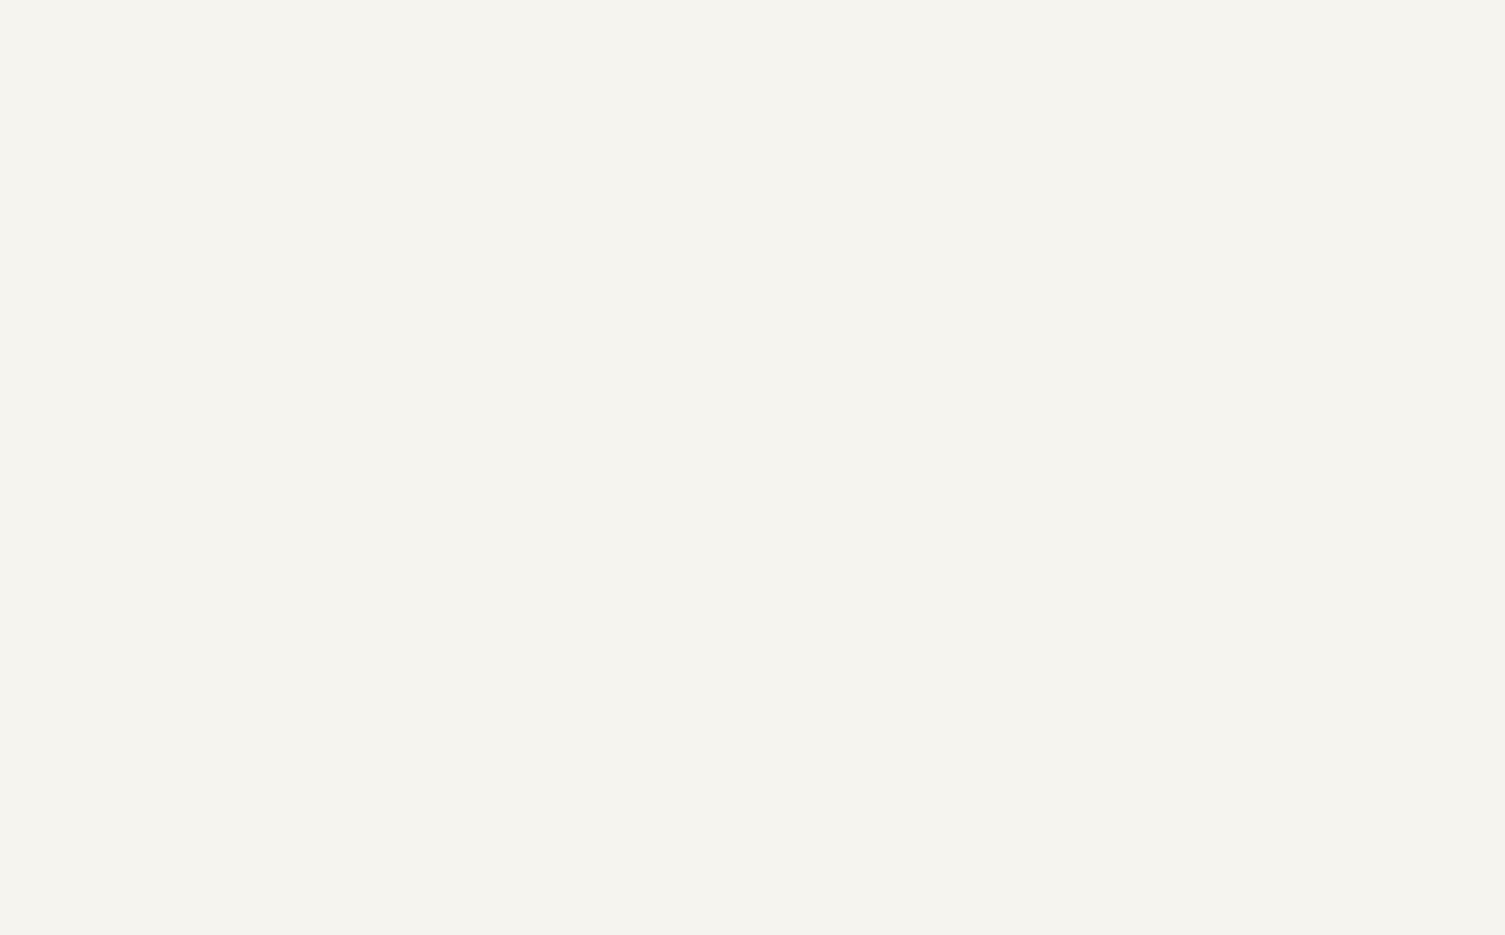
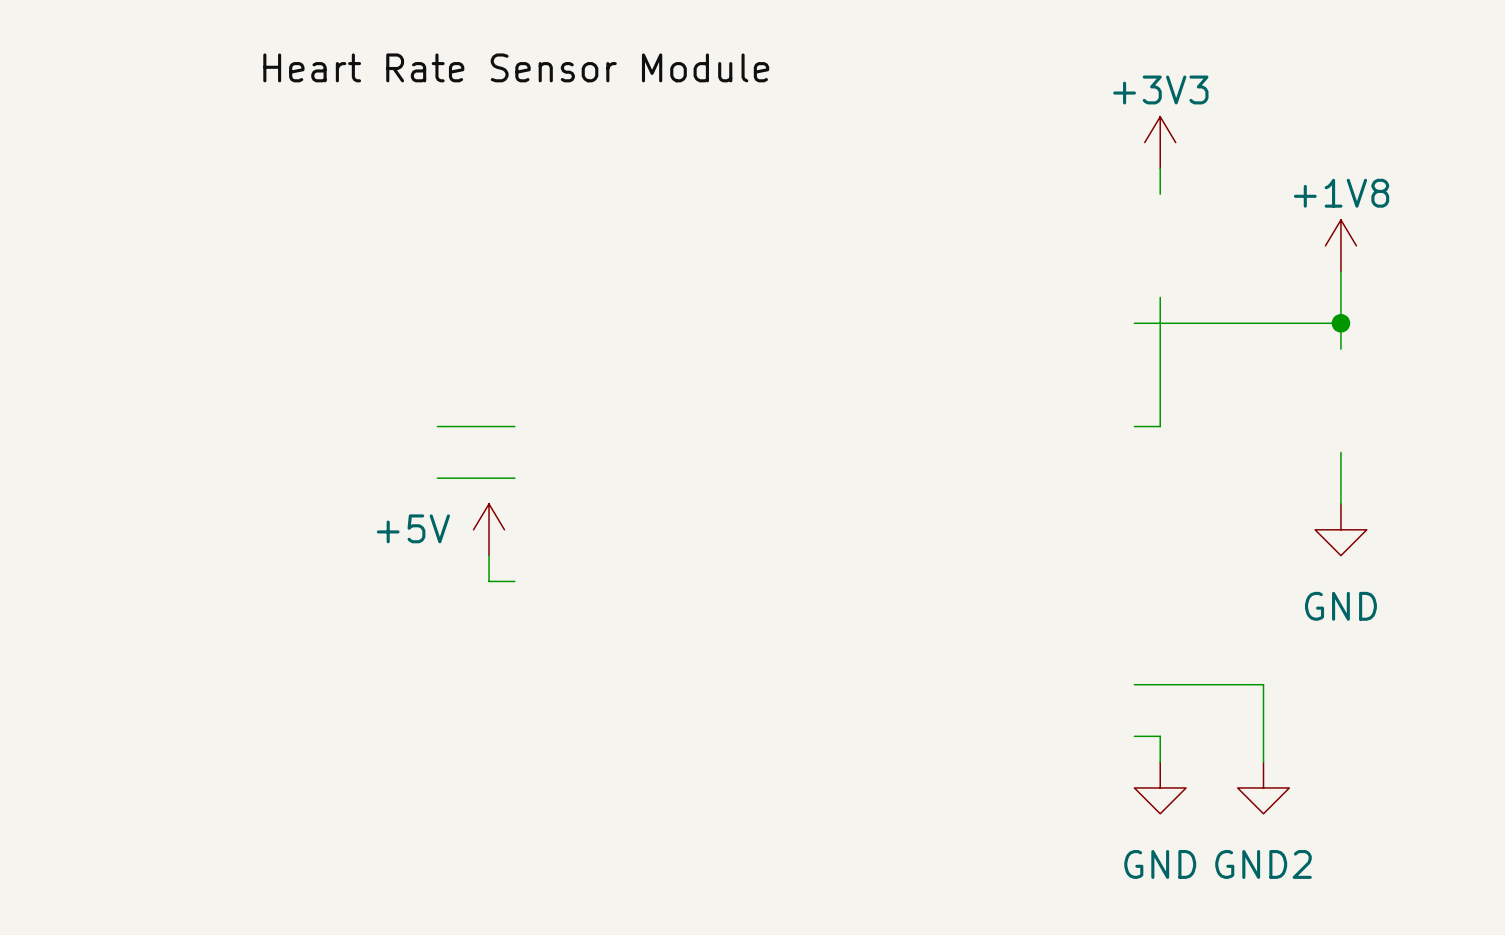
label: none -> Heart Rate Sensor Module (516, 67)
power symbol: none -> +3V3 (1160, 142)
wire: none -> (1160, 168) (1160, 194)
power symbol: none -> +1V8 (1340, 245)
wire: none -> (1340, 271) (1340, 349)
wire: none -> (1160, 297) (1160, 426) (1134, 426)
wire: none -> (1134, 323) (1340, 323)
junction: none -> (1340, 323)
wire: none -> (437, 426) (514, 426)
wire: none -> (1340, 452) (1340, 503)
wire: none -> (437, 478) (514, 478)
power symbol: none -> +5V (489, 529)
power symbol: none -> GND (1340, 529)
wire: none -> (489, 555) (489, 581) (514, 581)
wire: none -> (1134, 684) (1263, 684) (1263, 762)
wire: none -> (1134, 736) (1160, 736) (1160, 762)
power symbol: none -> GND (1160, 787)
power symbol: none -> GND2 (1263, 787)

